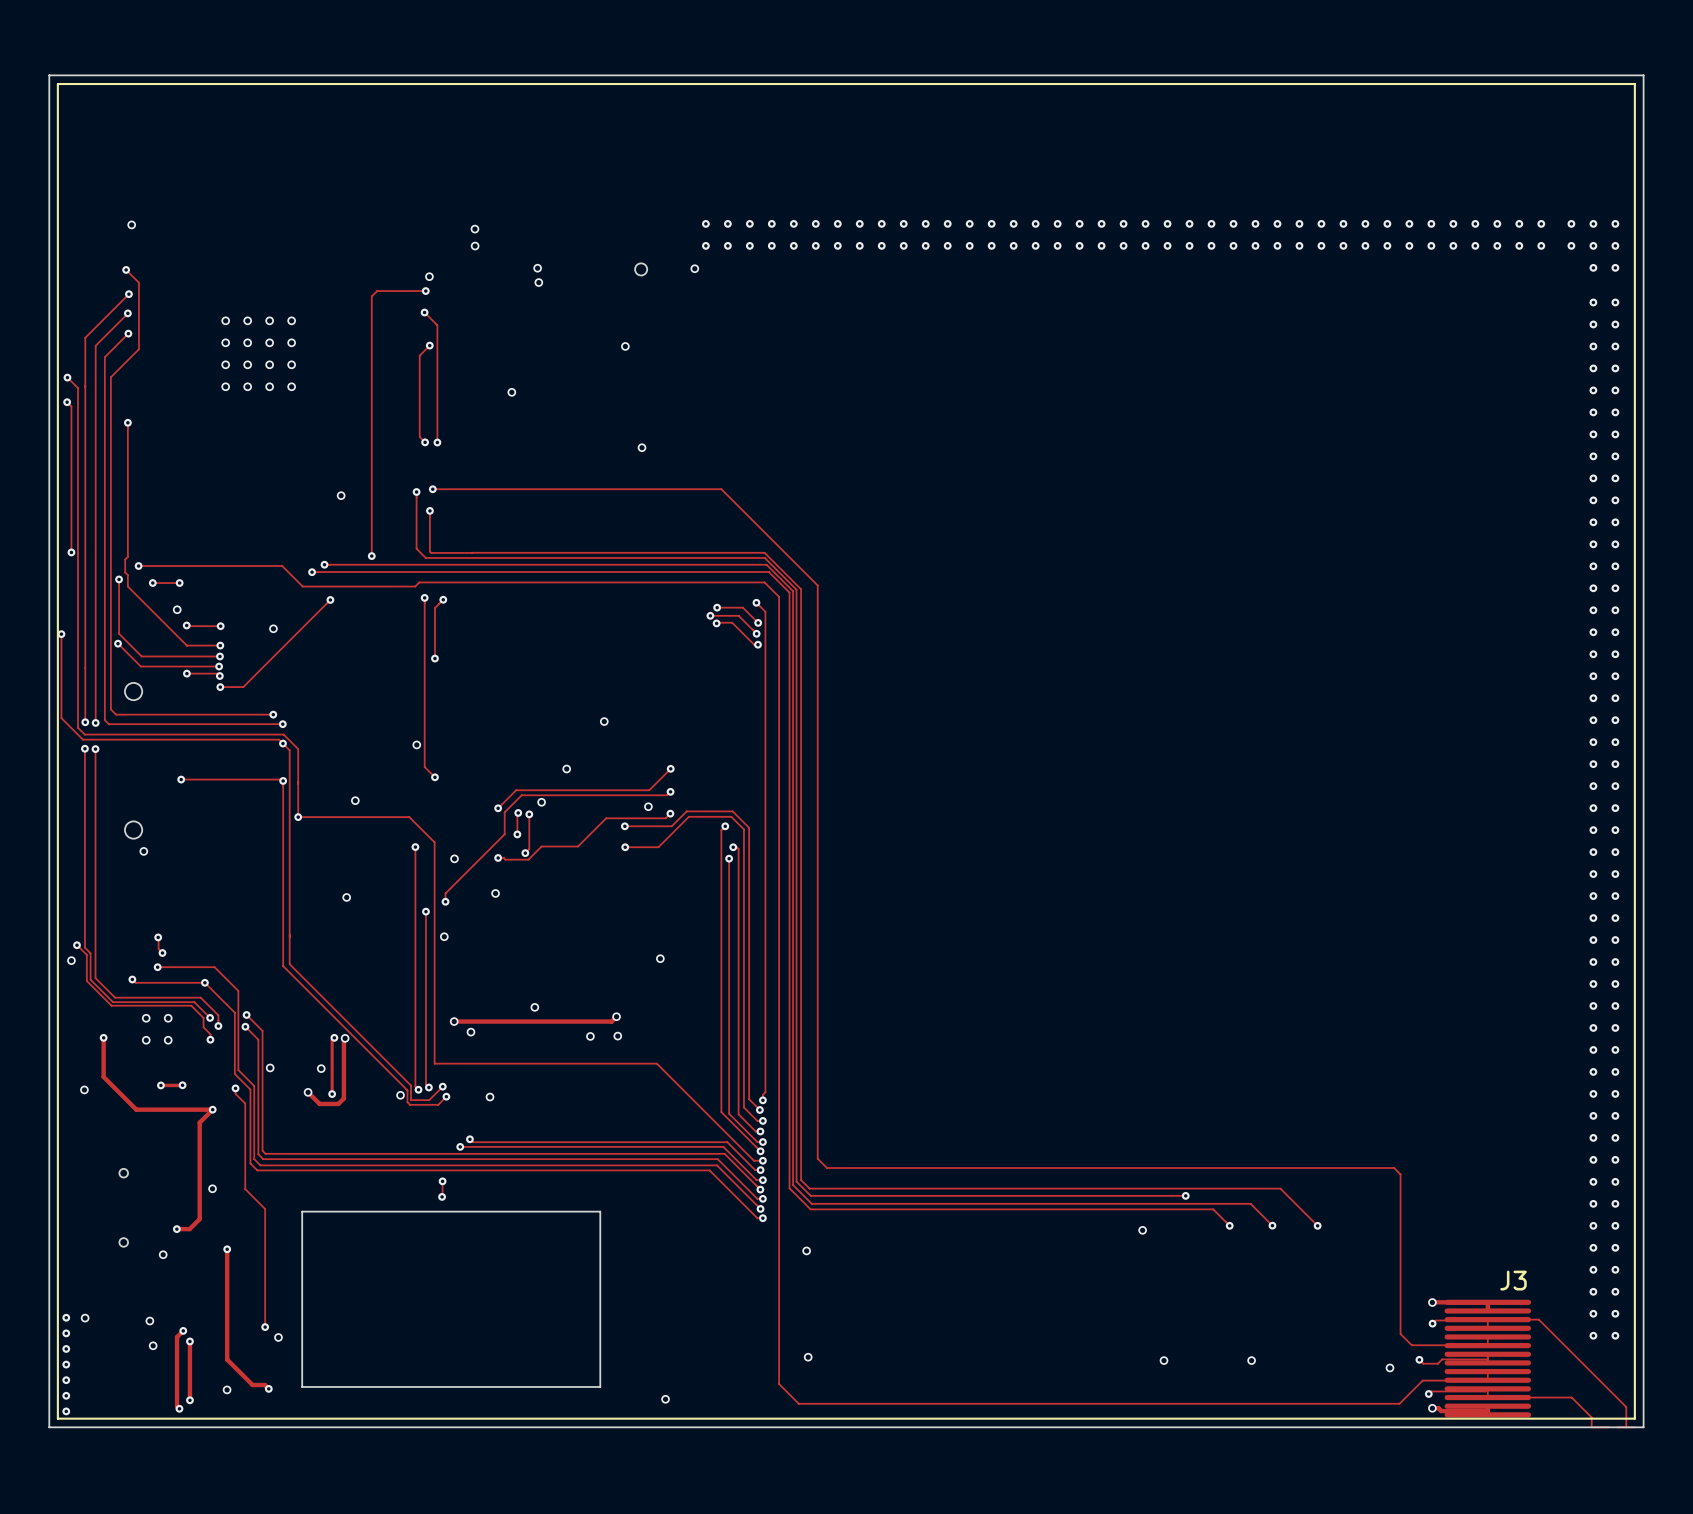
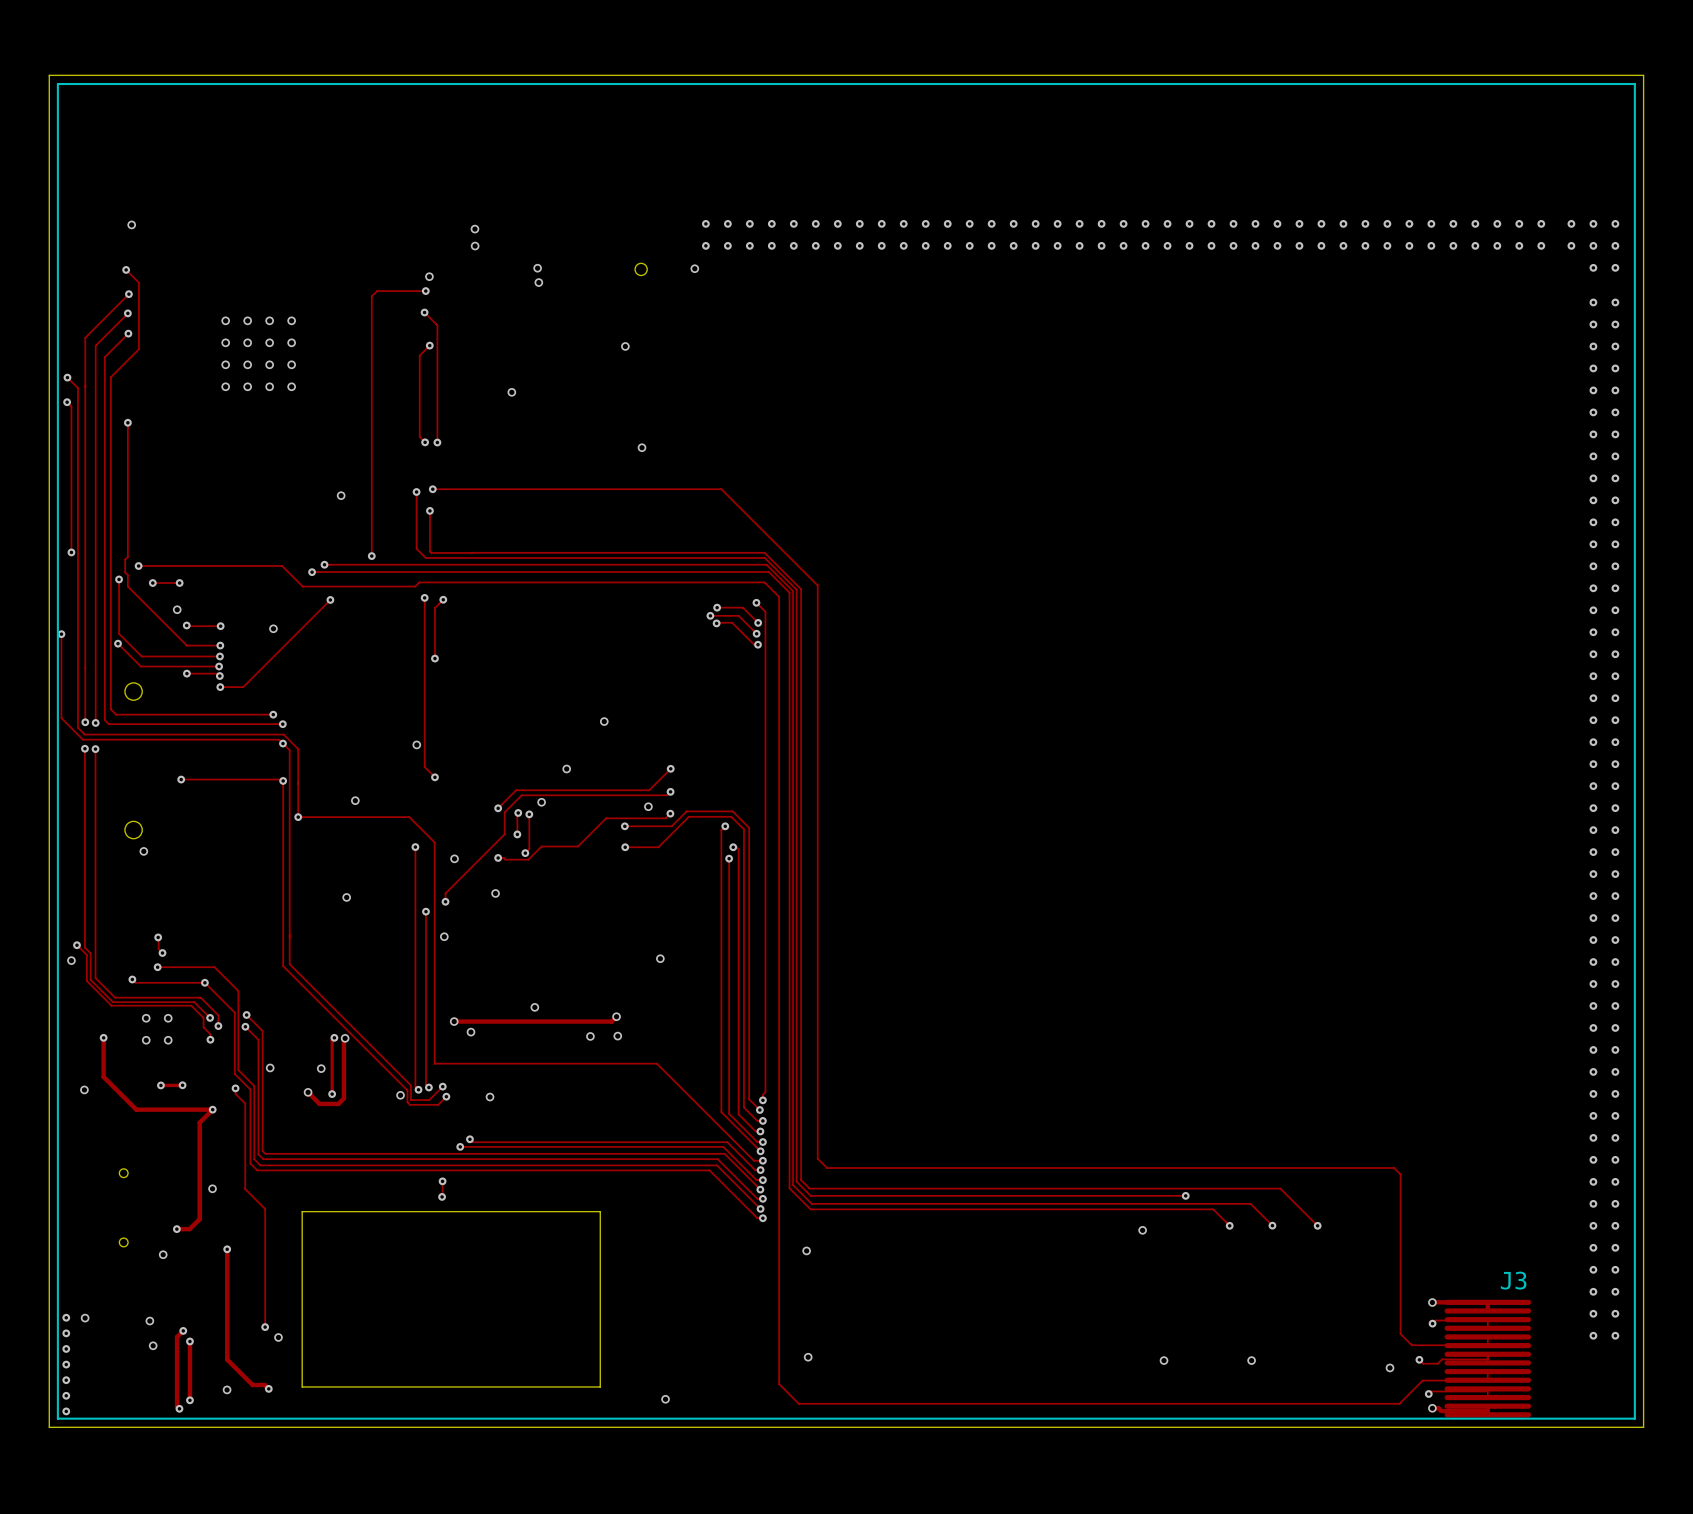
track: (1487, 1319) (1538, 1319) (1626, 1407) (1626, 1427) -> none
track: (1487, 1397) (1571, 1397) (1591, 1417) (1591, 1427) (1608, 1427) -> none
track: (1617, 1427) (1634, 1427) -> none

